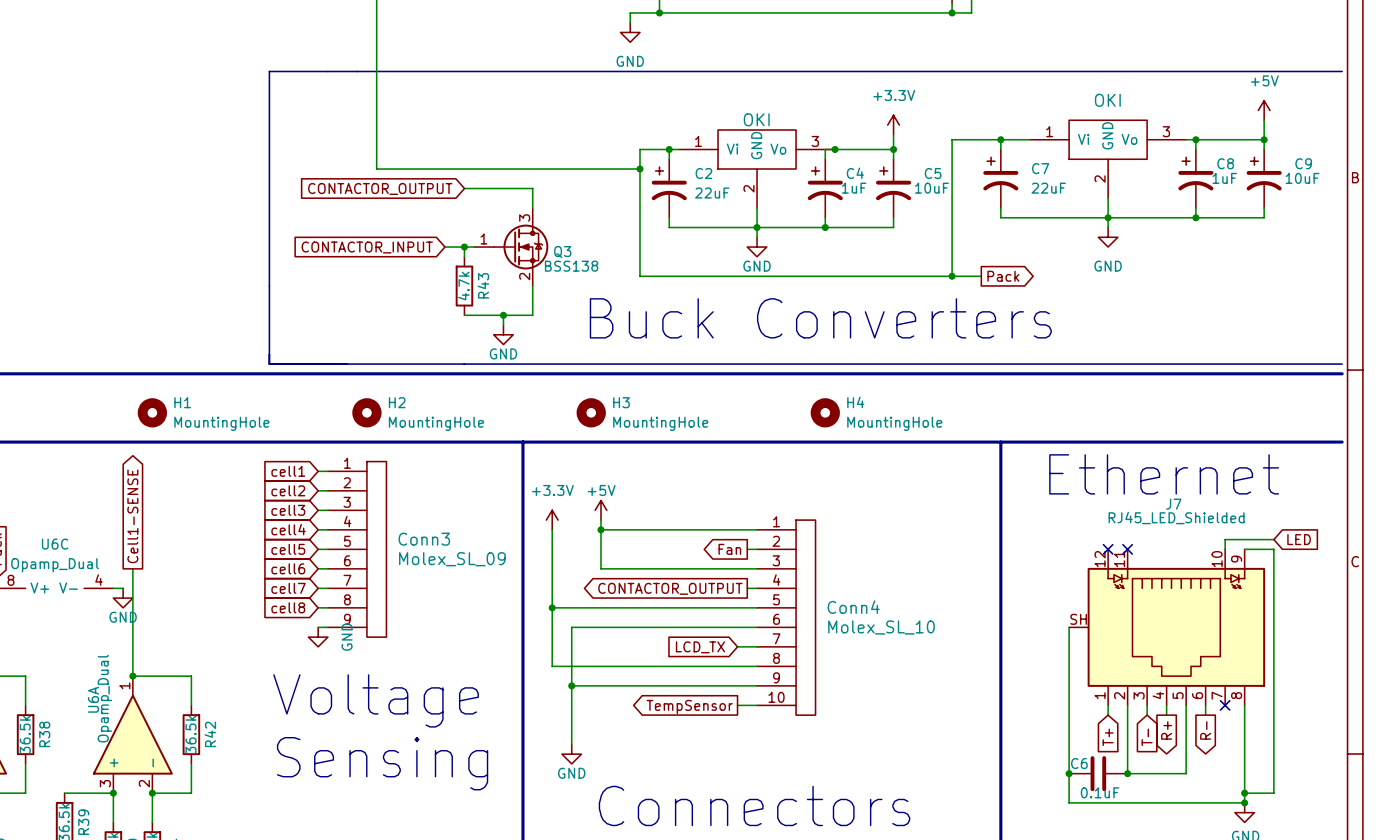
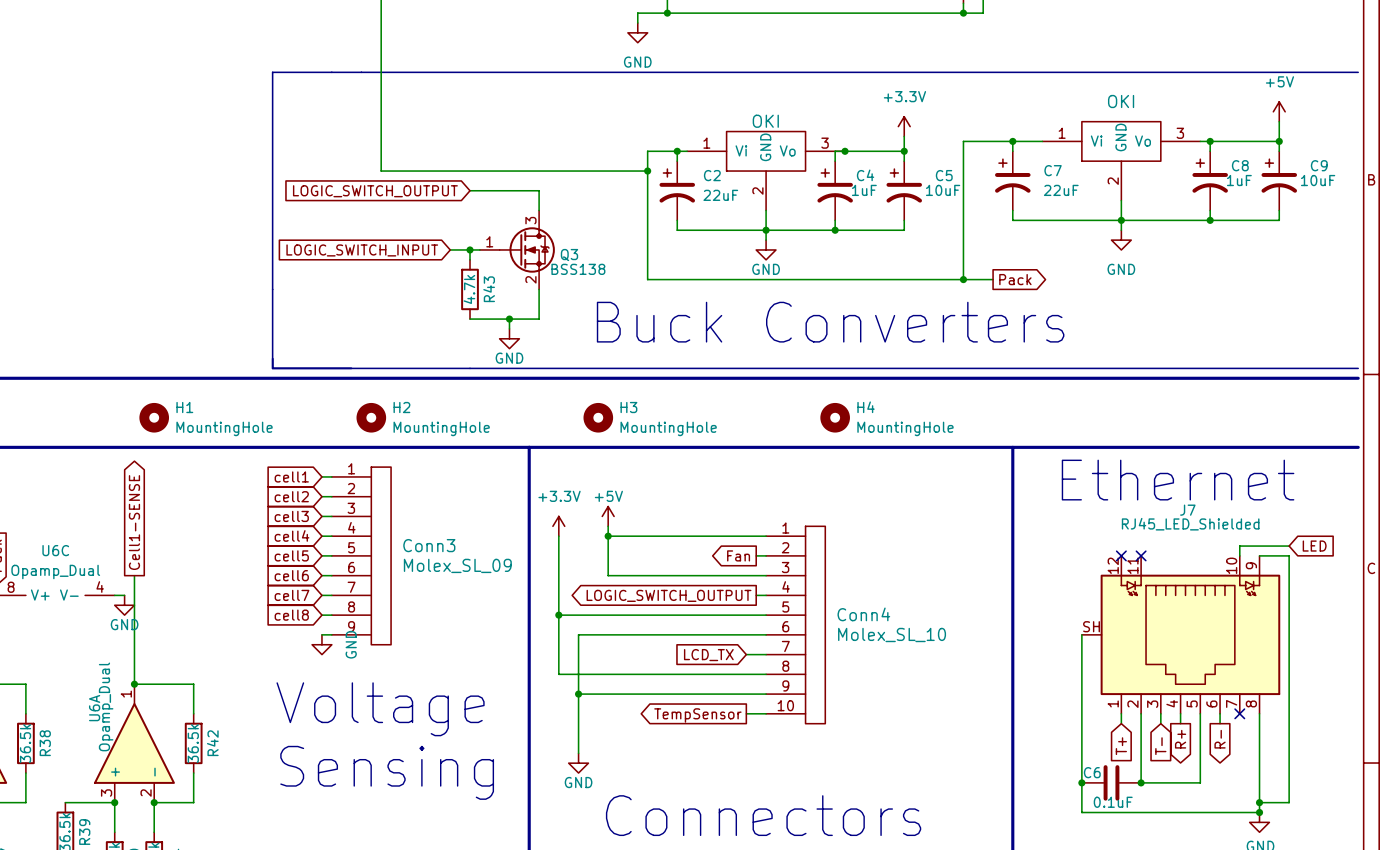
global label: CONTACTOR_OUTPUT (380, 188) -> LOGIC_SWITCH_OUTPUT (375, 191)
global label: CONTACTOR_INPUT (367, 247) -> LOGIC_SWITCH_INPUT (362, 250)
global label: CONTACTOR_OUTPUT (670, 588) -> LOGIC_SWITCH_OUTPUT (669, 595)

